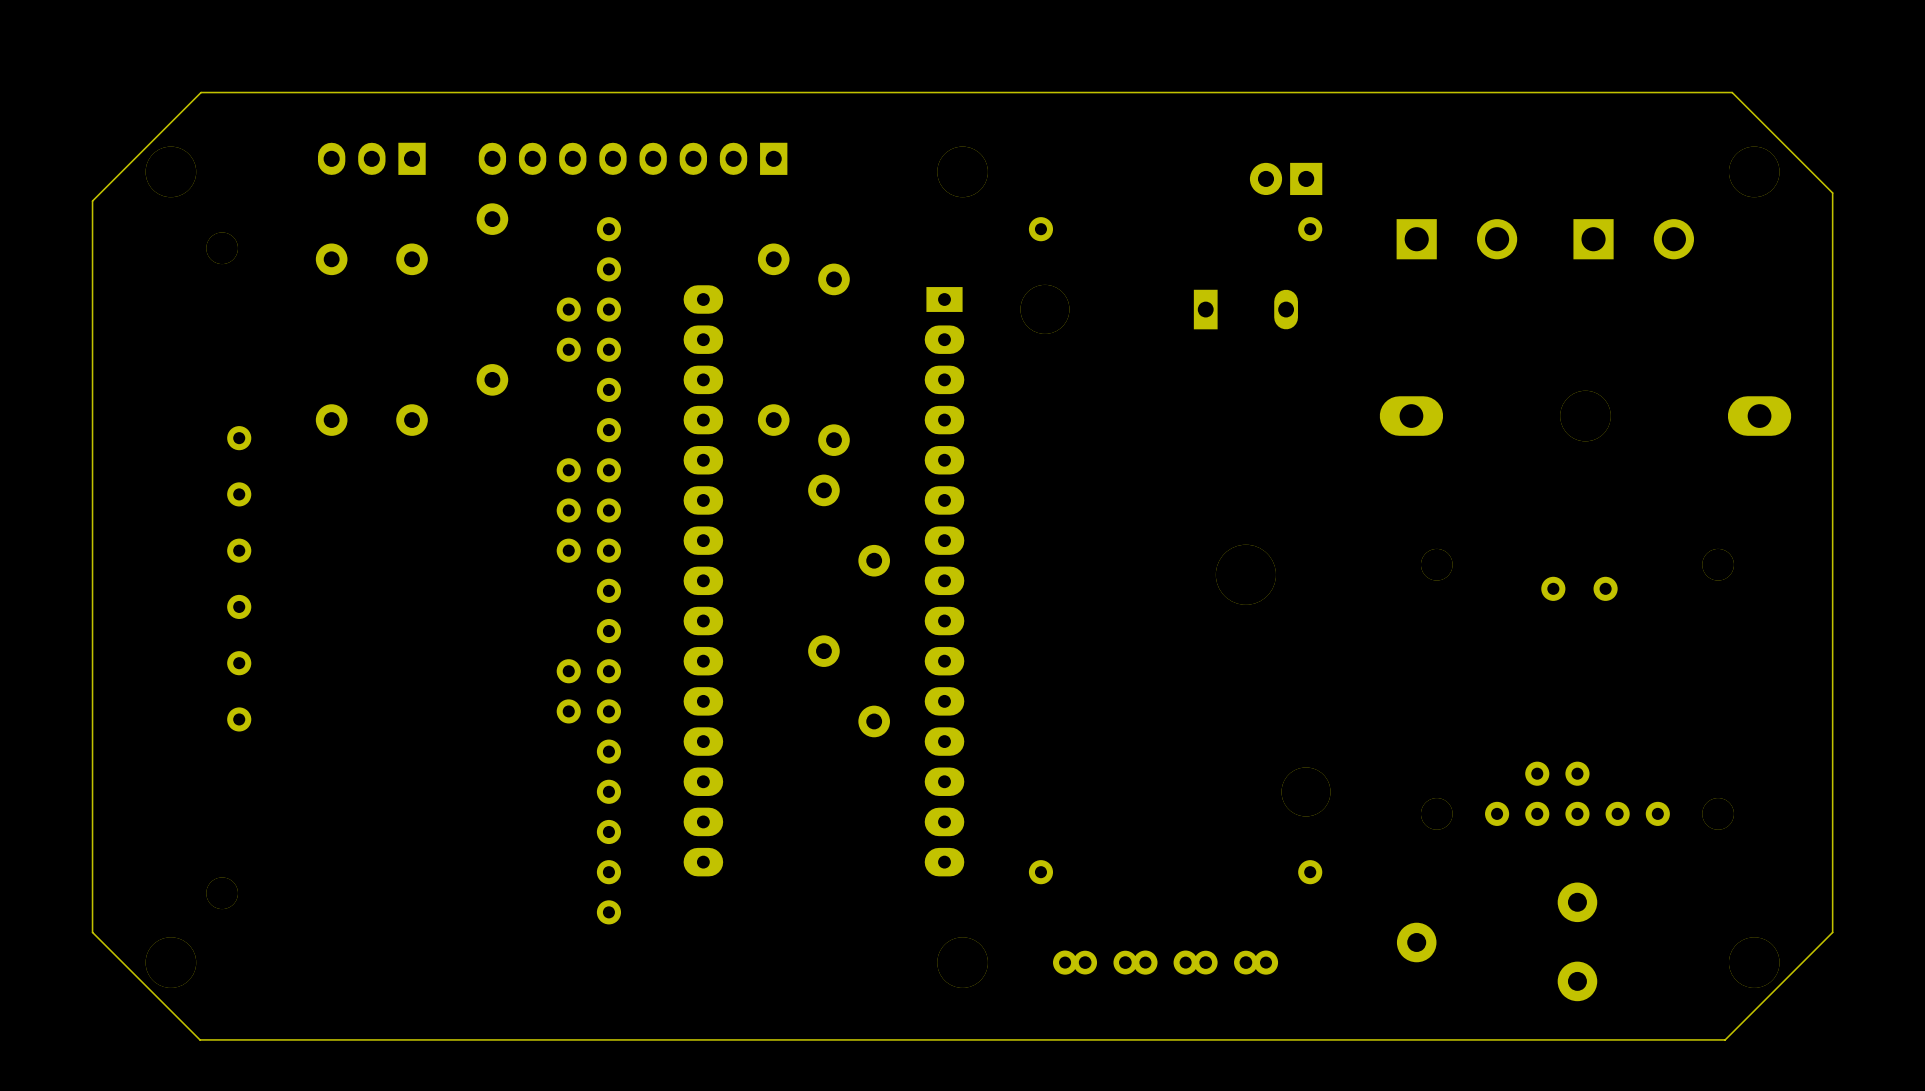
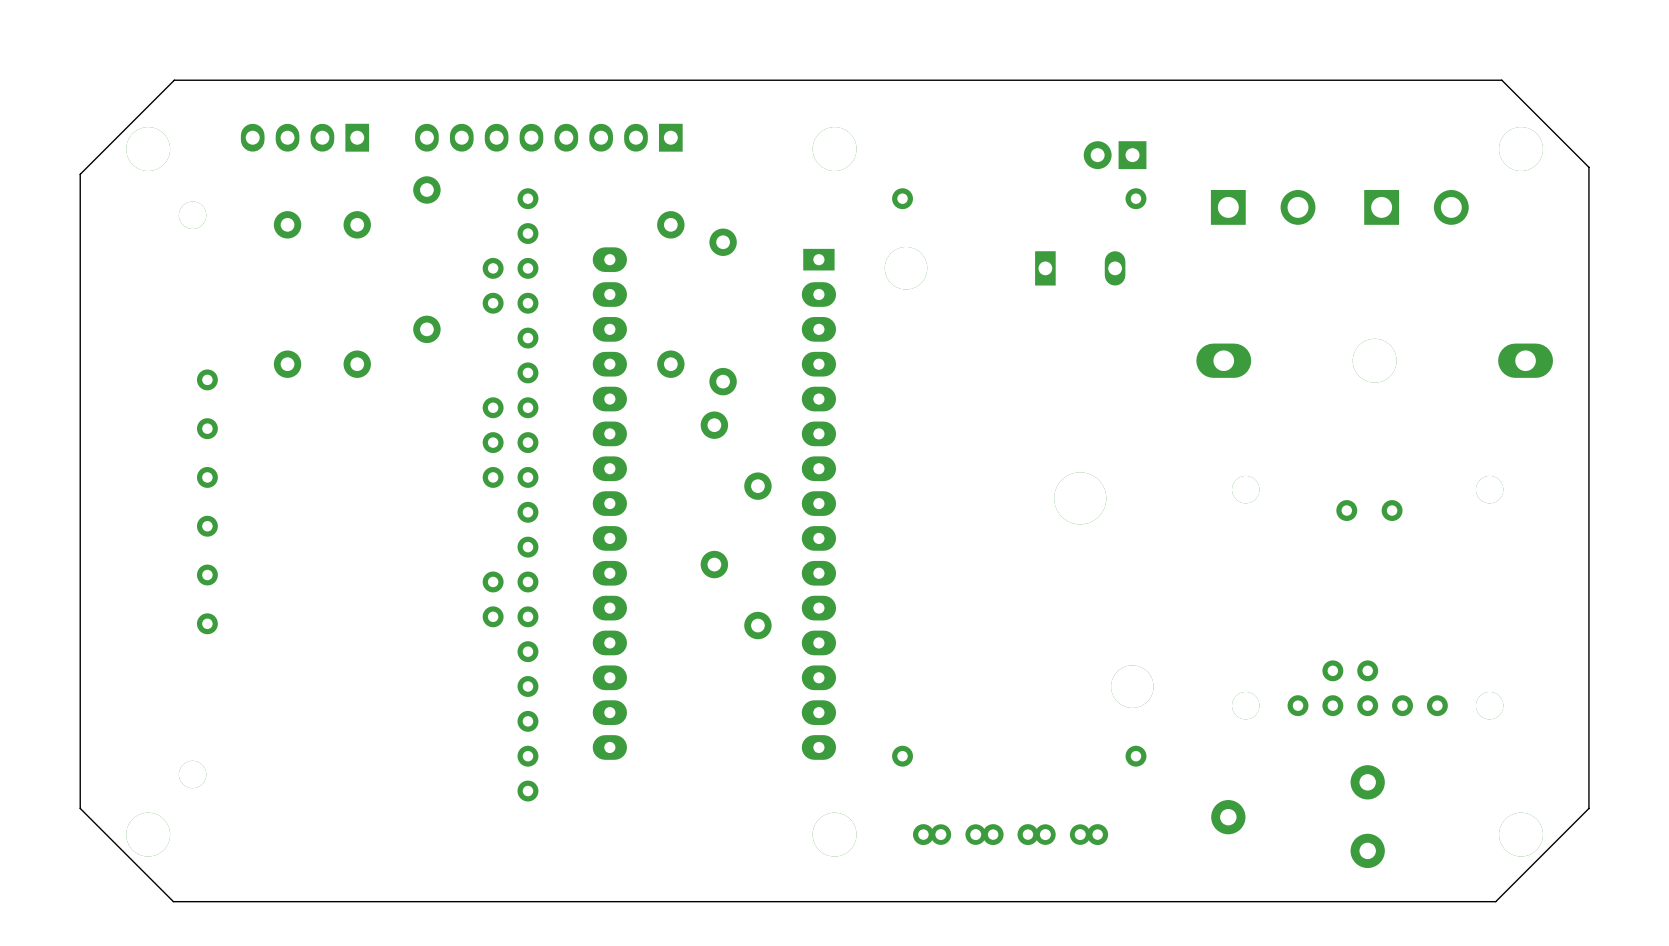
part: none -> (304, 137)

